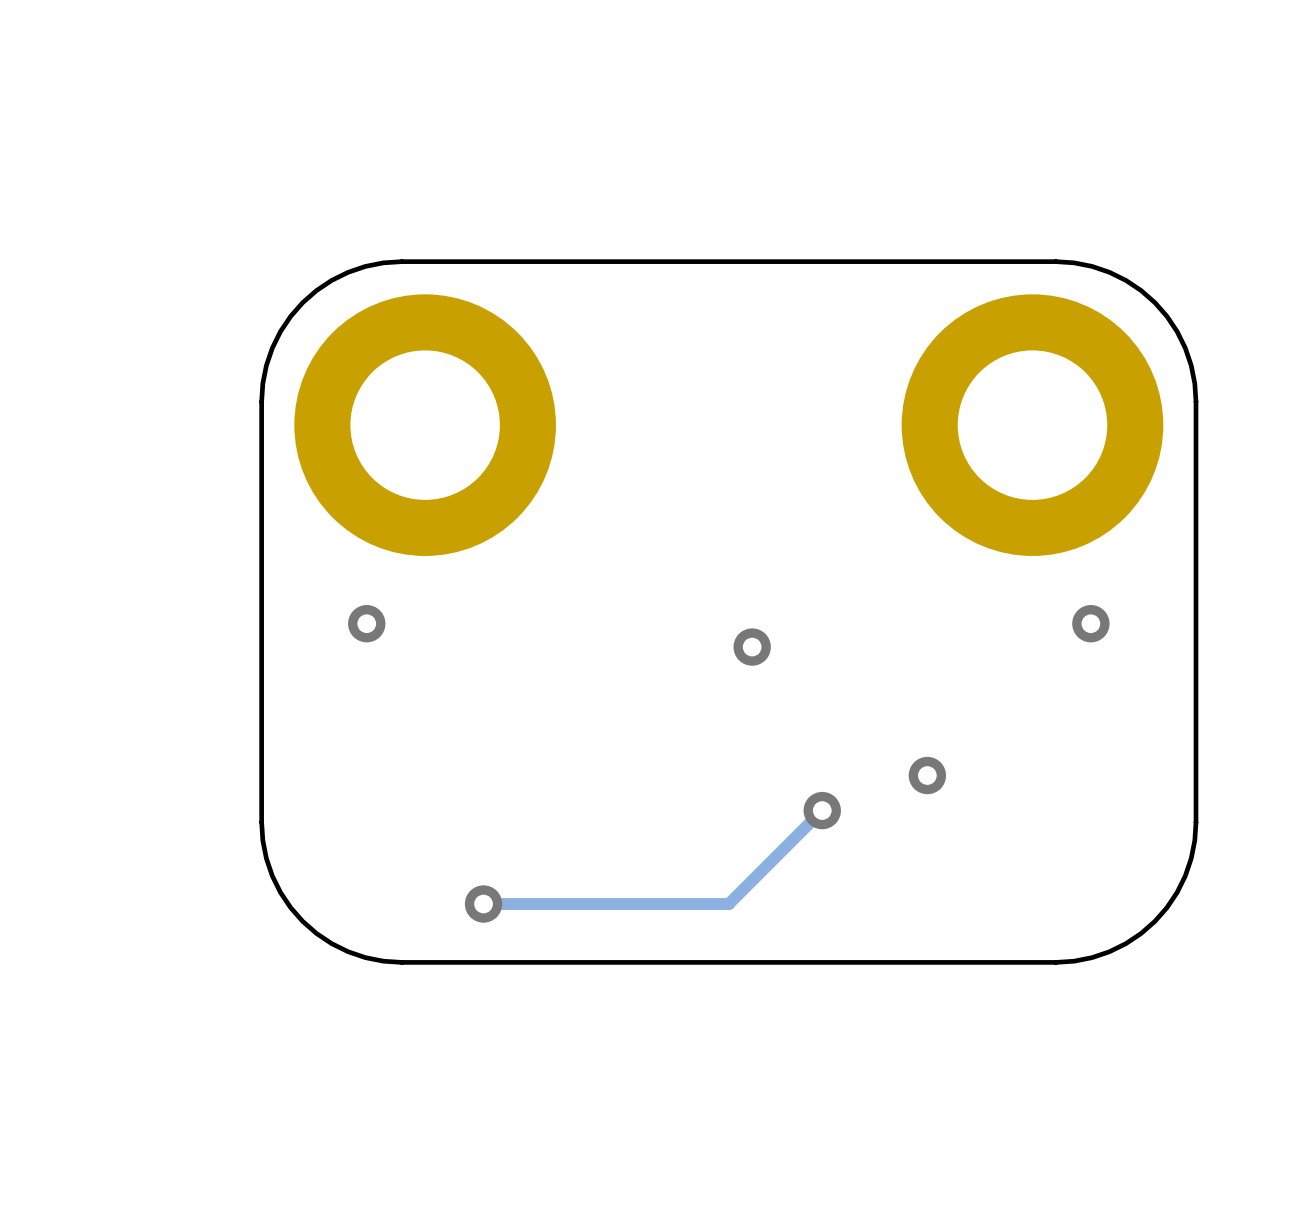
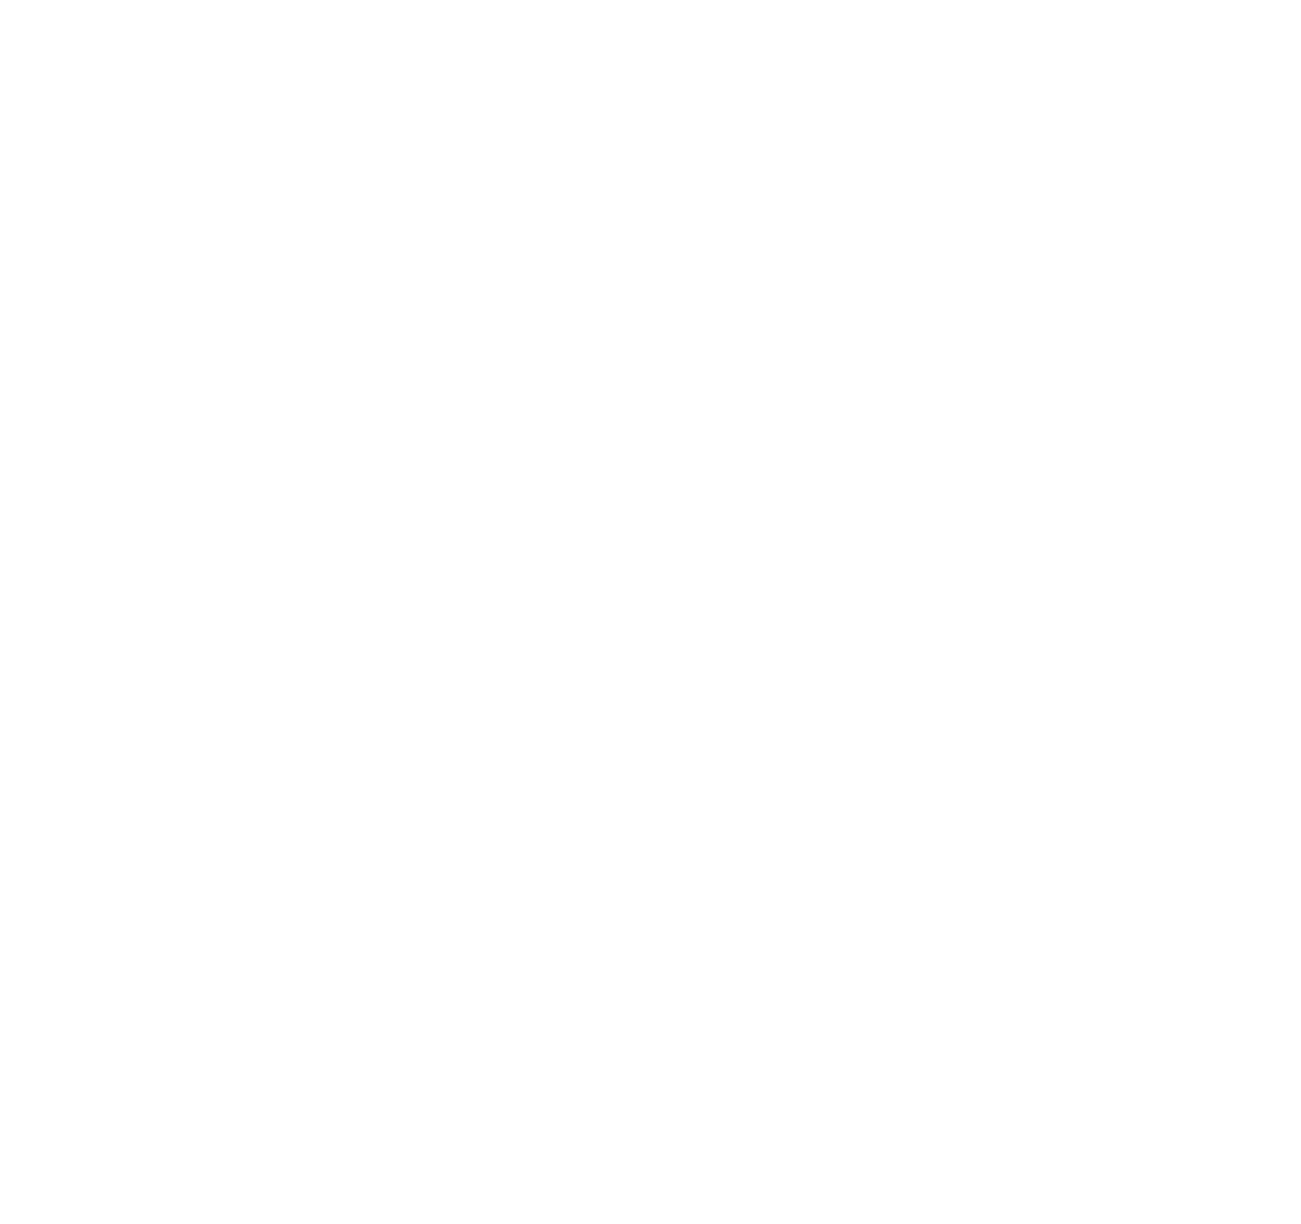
board edge: (1055, 261) (401, 261) (365, 266) (348, 272) (316, 290) (290, 316) (280, 331) (266, 365) (261, 401) (261, 822) (262, 840) (272, 875) (290, 907) (316, 933) (348, 951) (383, 961) (401, 962) (1055, 962) (1092, 957) (1125, 943) (1141, 933) (1167, 907) (1177, 892) (1191, 858) (1194, 840) (1194, 383) (1191, 365) (1177, 331) (1154, 302) (1125, 280) (1109, 272) (1092, 266) (1055, 261) -> none
part: (425, 425) -> none
part: (1032, 425) -> none
via: (366, 623) -> none
via: (1090, 623) -> none
via: (752, 647) -> none
via: (927, 775) -> none
track: (822, 810) (728, 904) (483, 904) -> none
via: (822, 810) -> none
via: (483, 904) -> none

